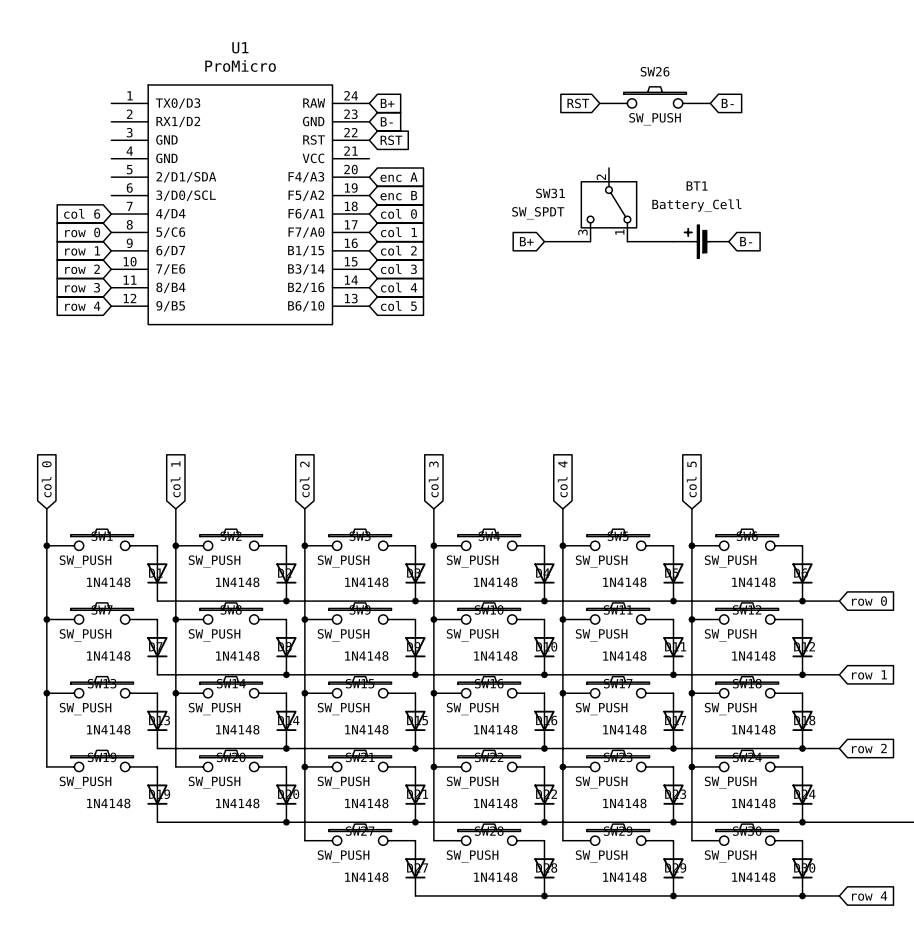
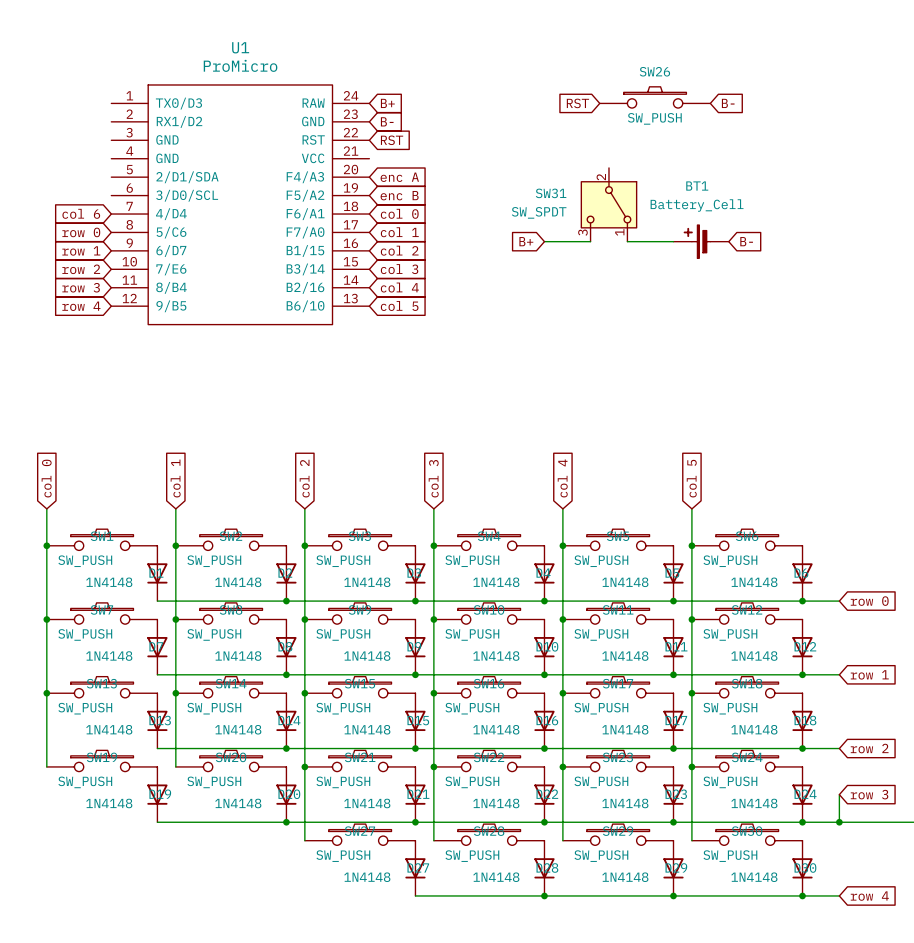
wire: none -> (839, 794) (839, 822)
global label: none -> row 3 (869, 794)
junction: none -> (839, 822)

